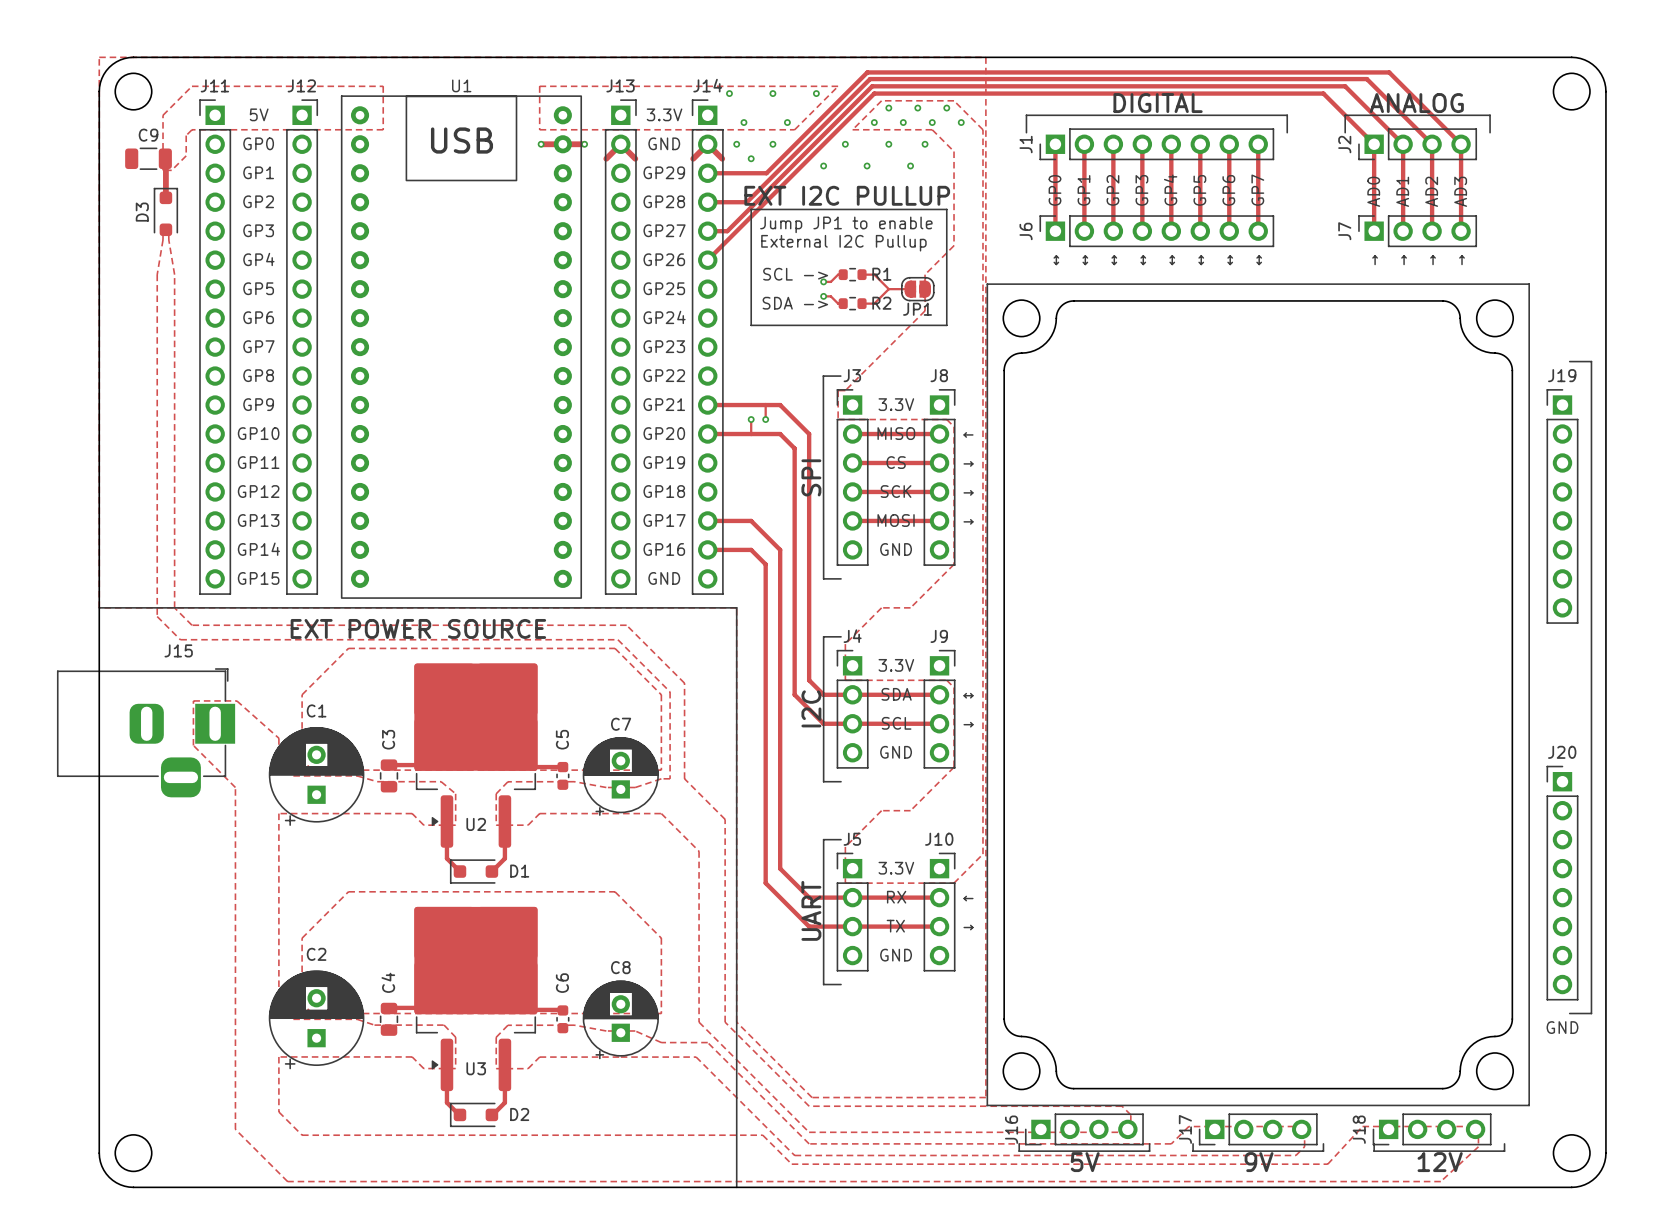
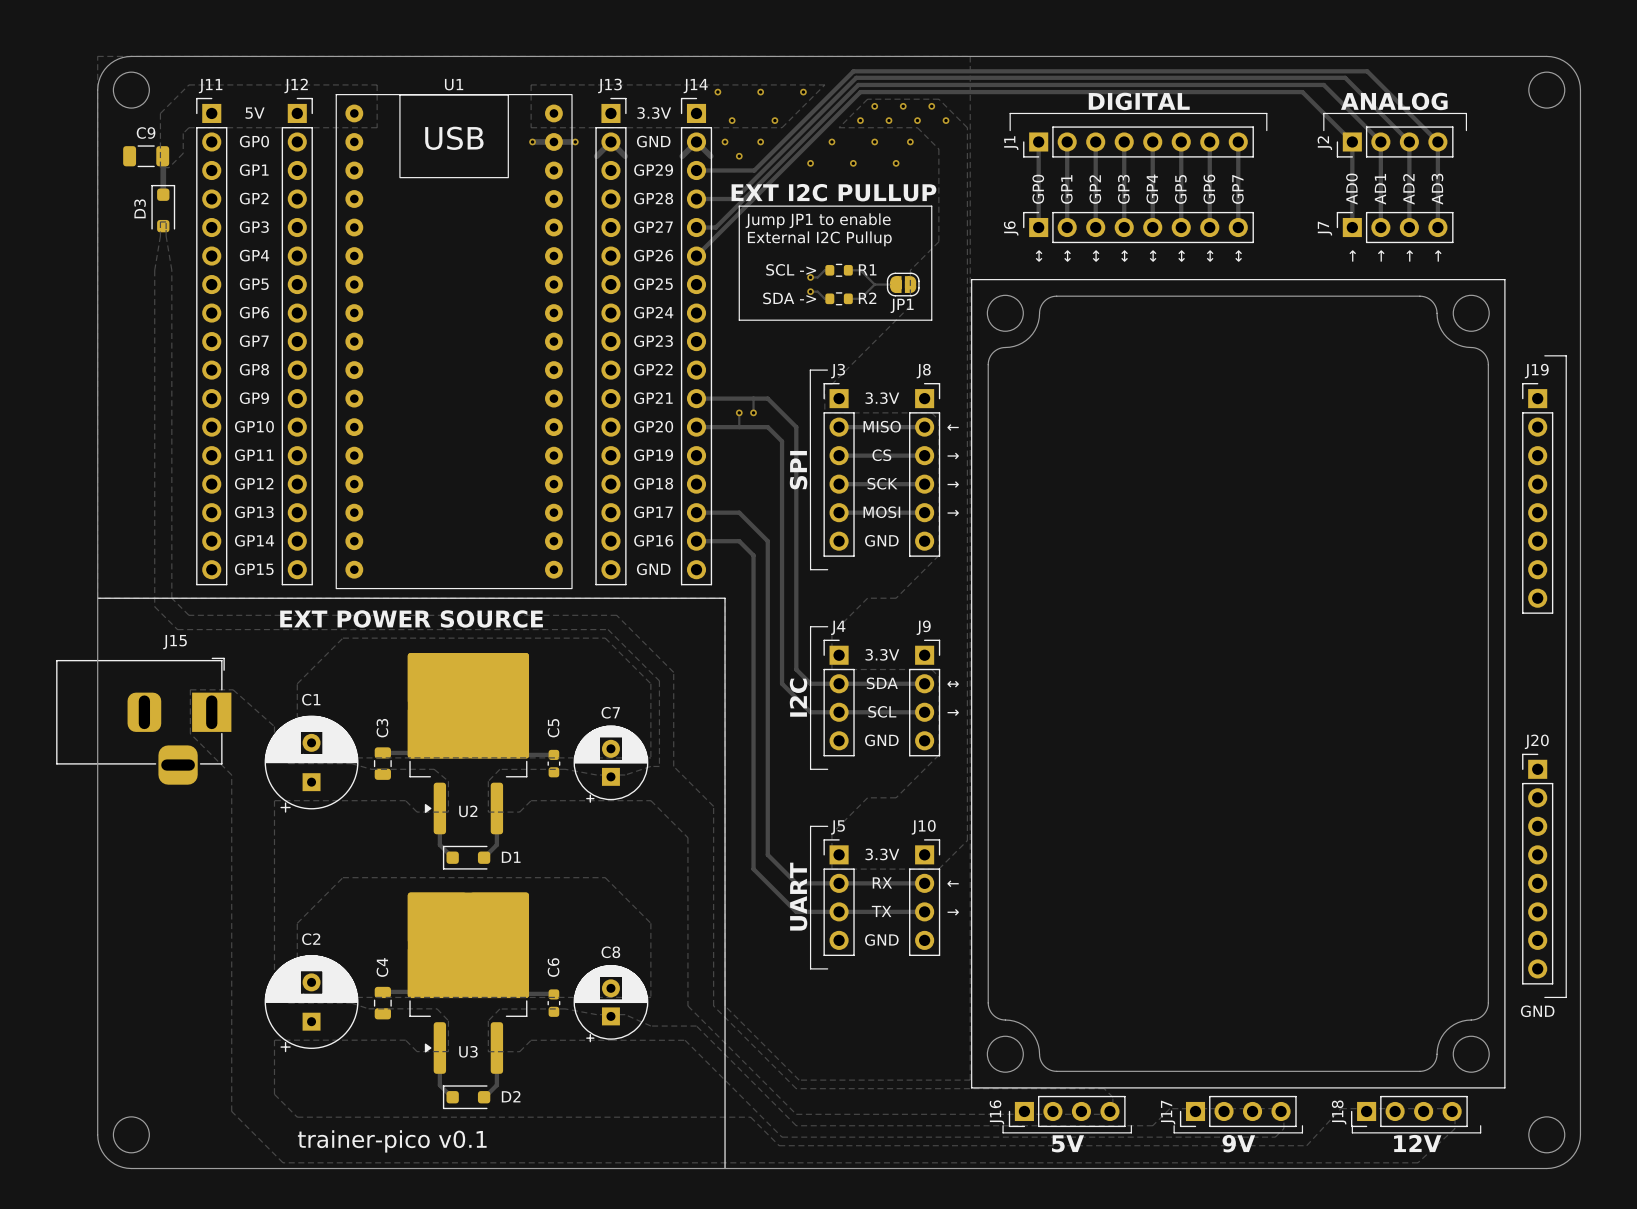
text: none -> trainer-pico v0.1 (392, 1141)

